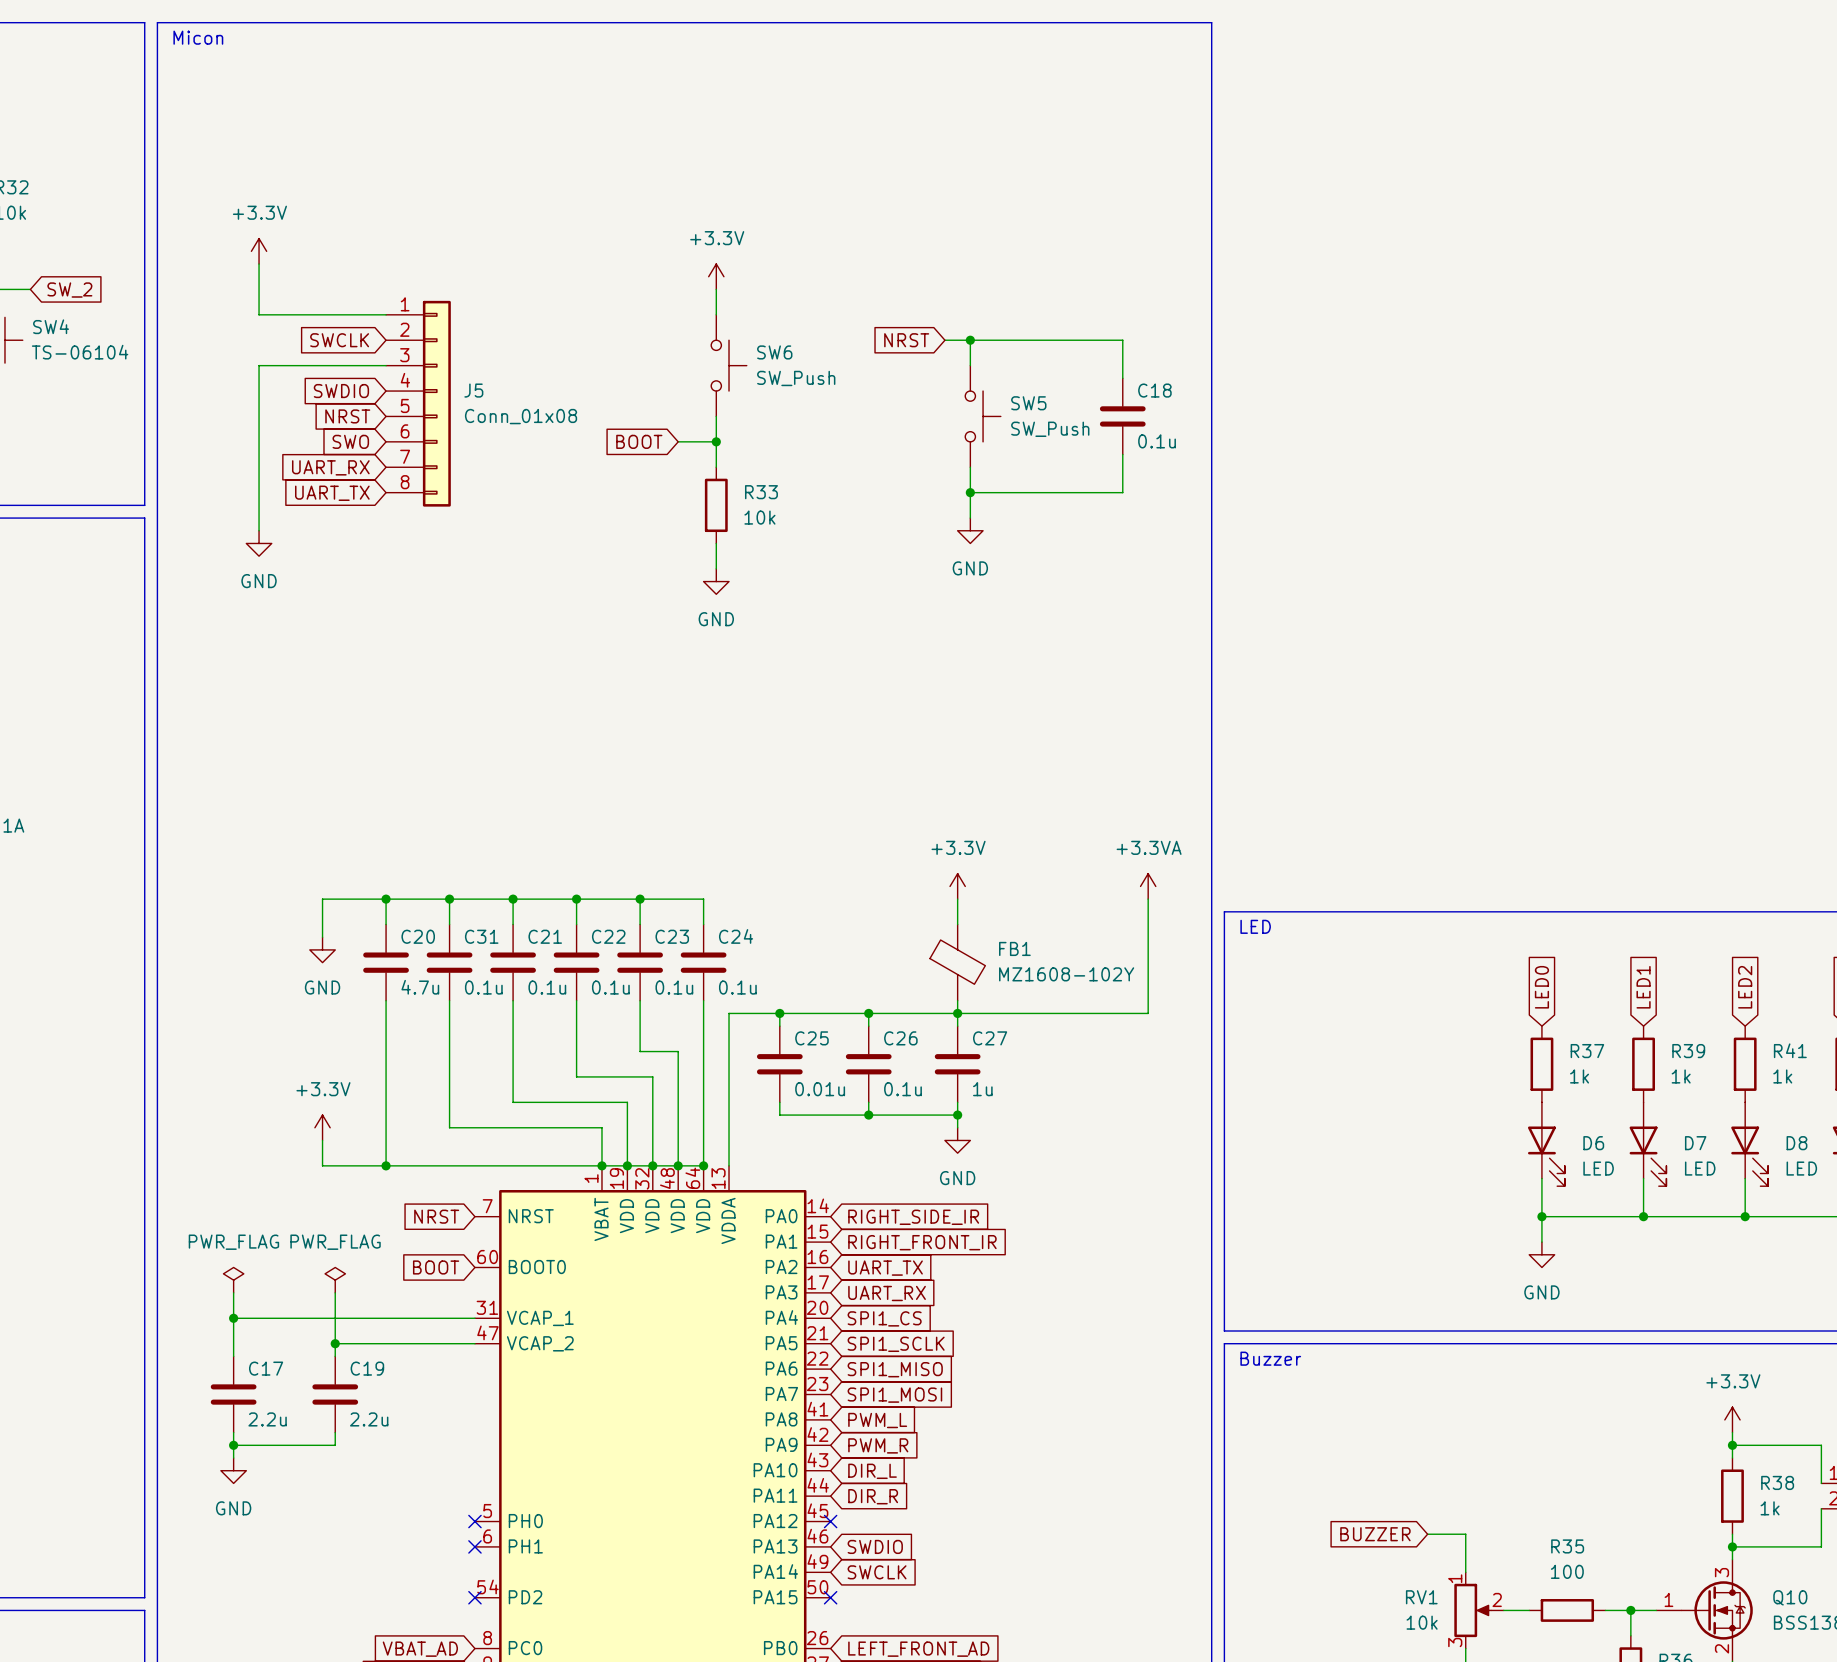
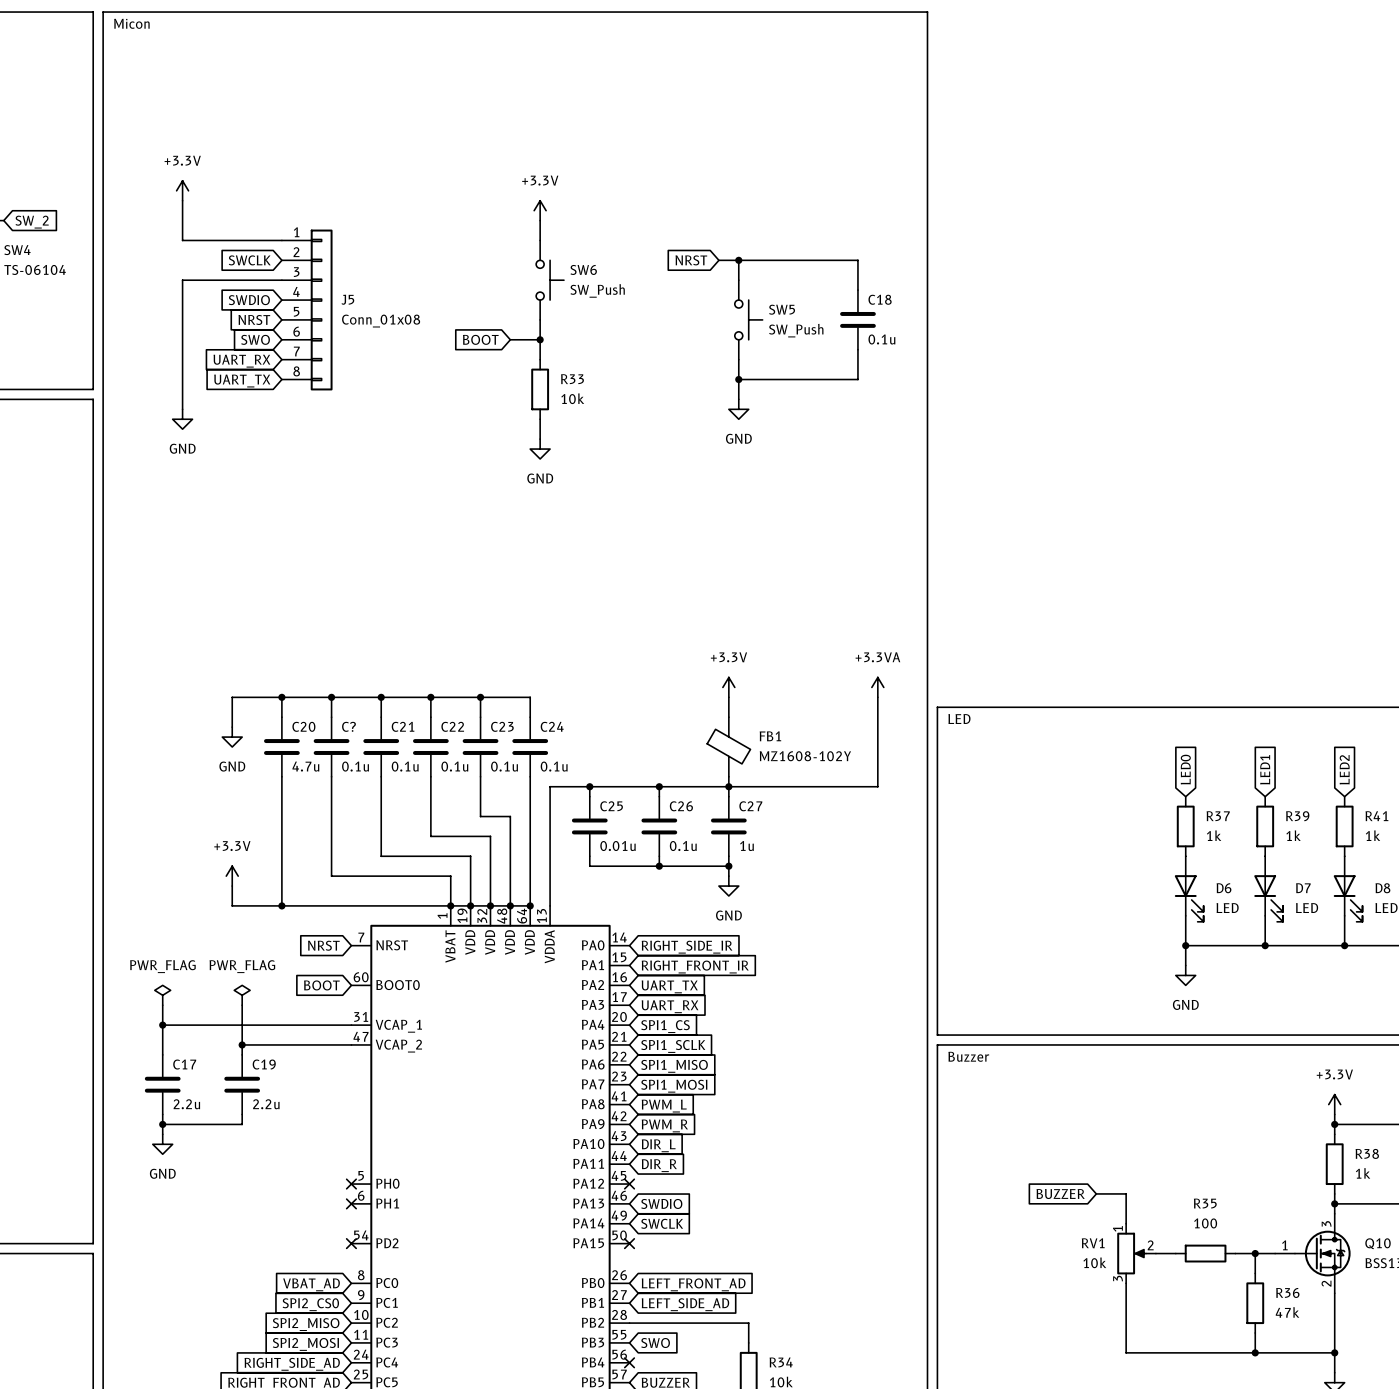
C31 name: C31 (481, 936) -> C? (348, 726)

